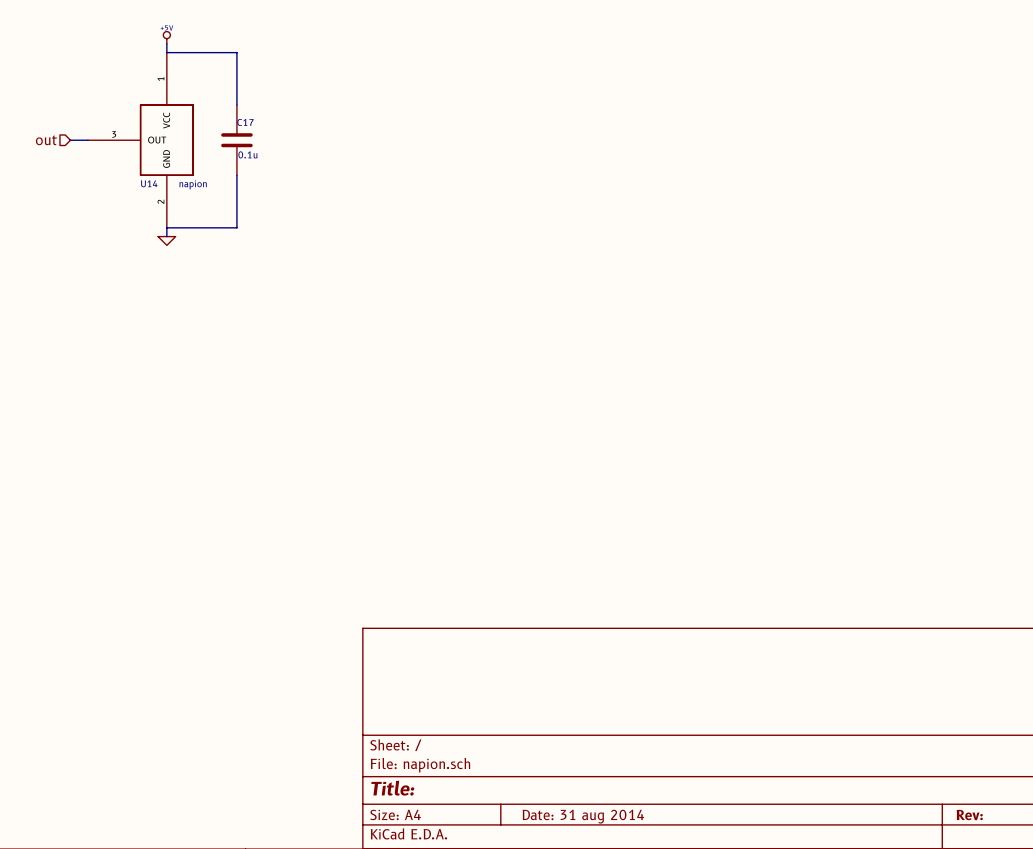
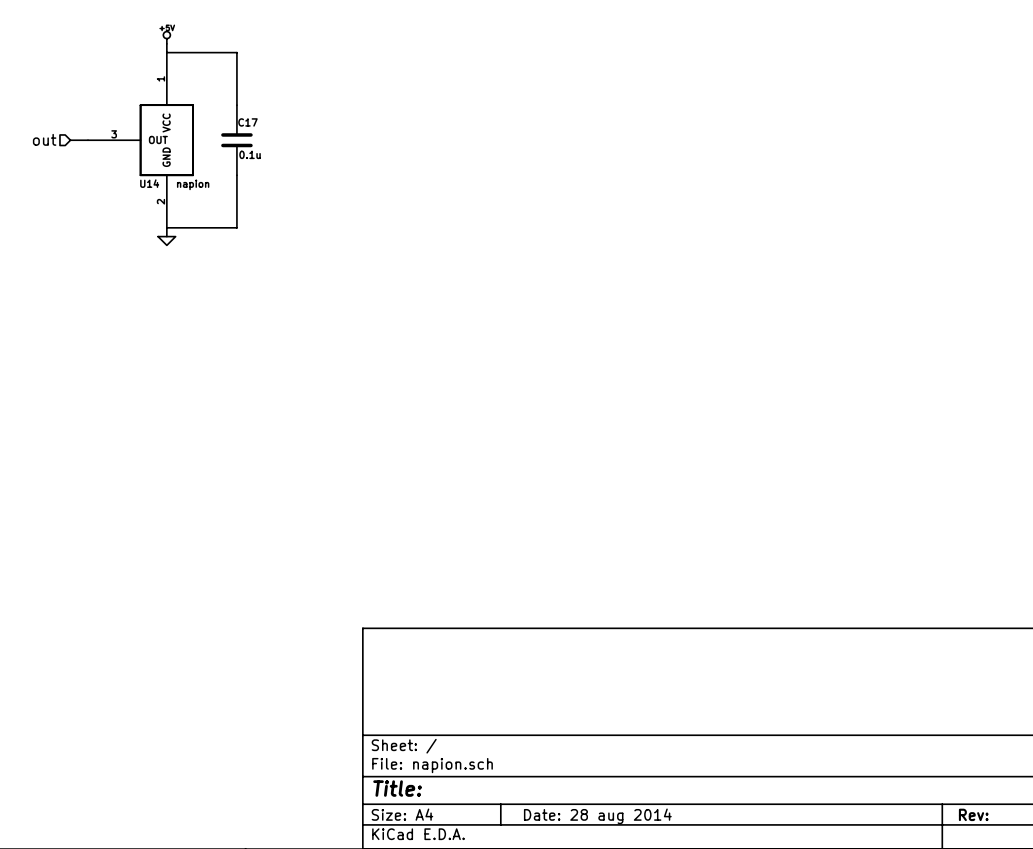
title block: Date: 31 aug 2014 (583, 816) -> Date: 28 aug 2014 (597, 816)

